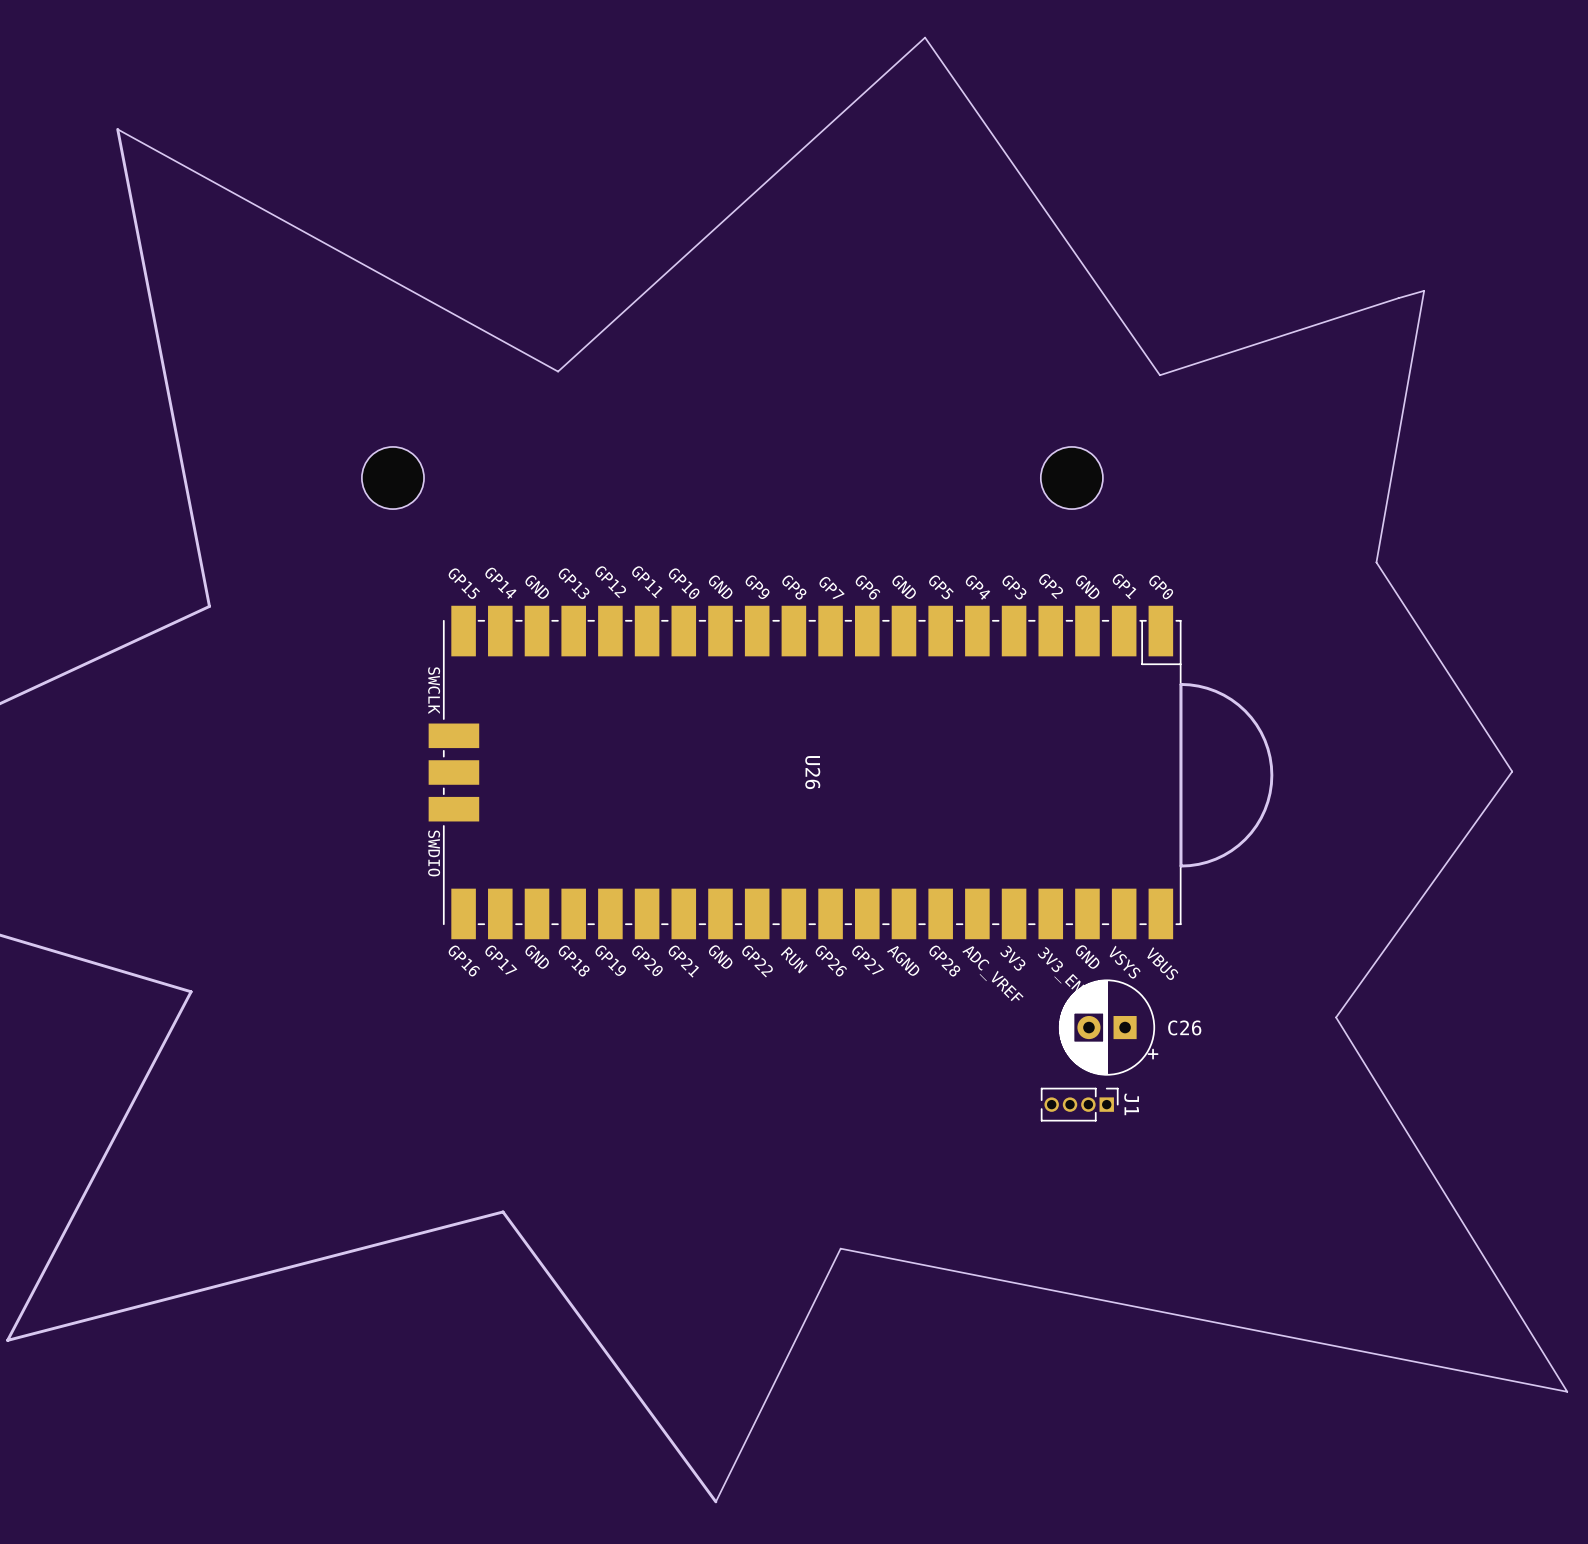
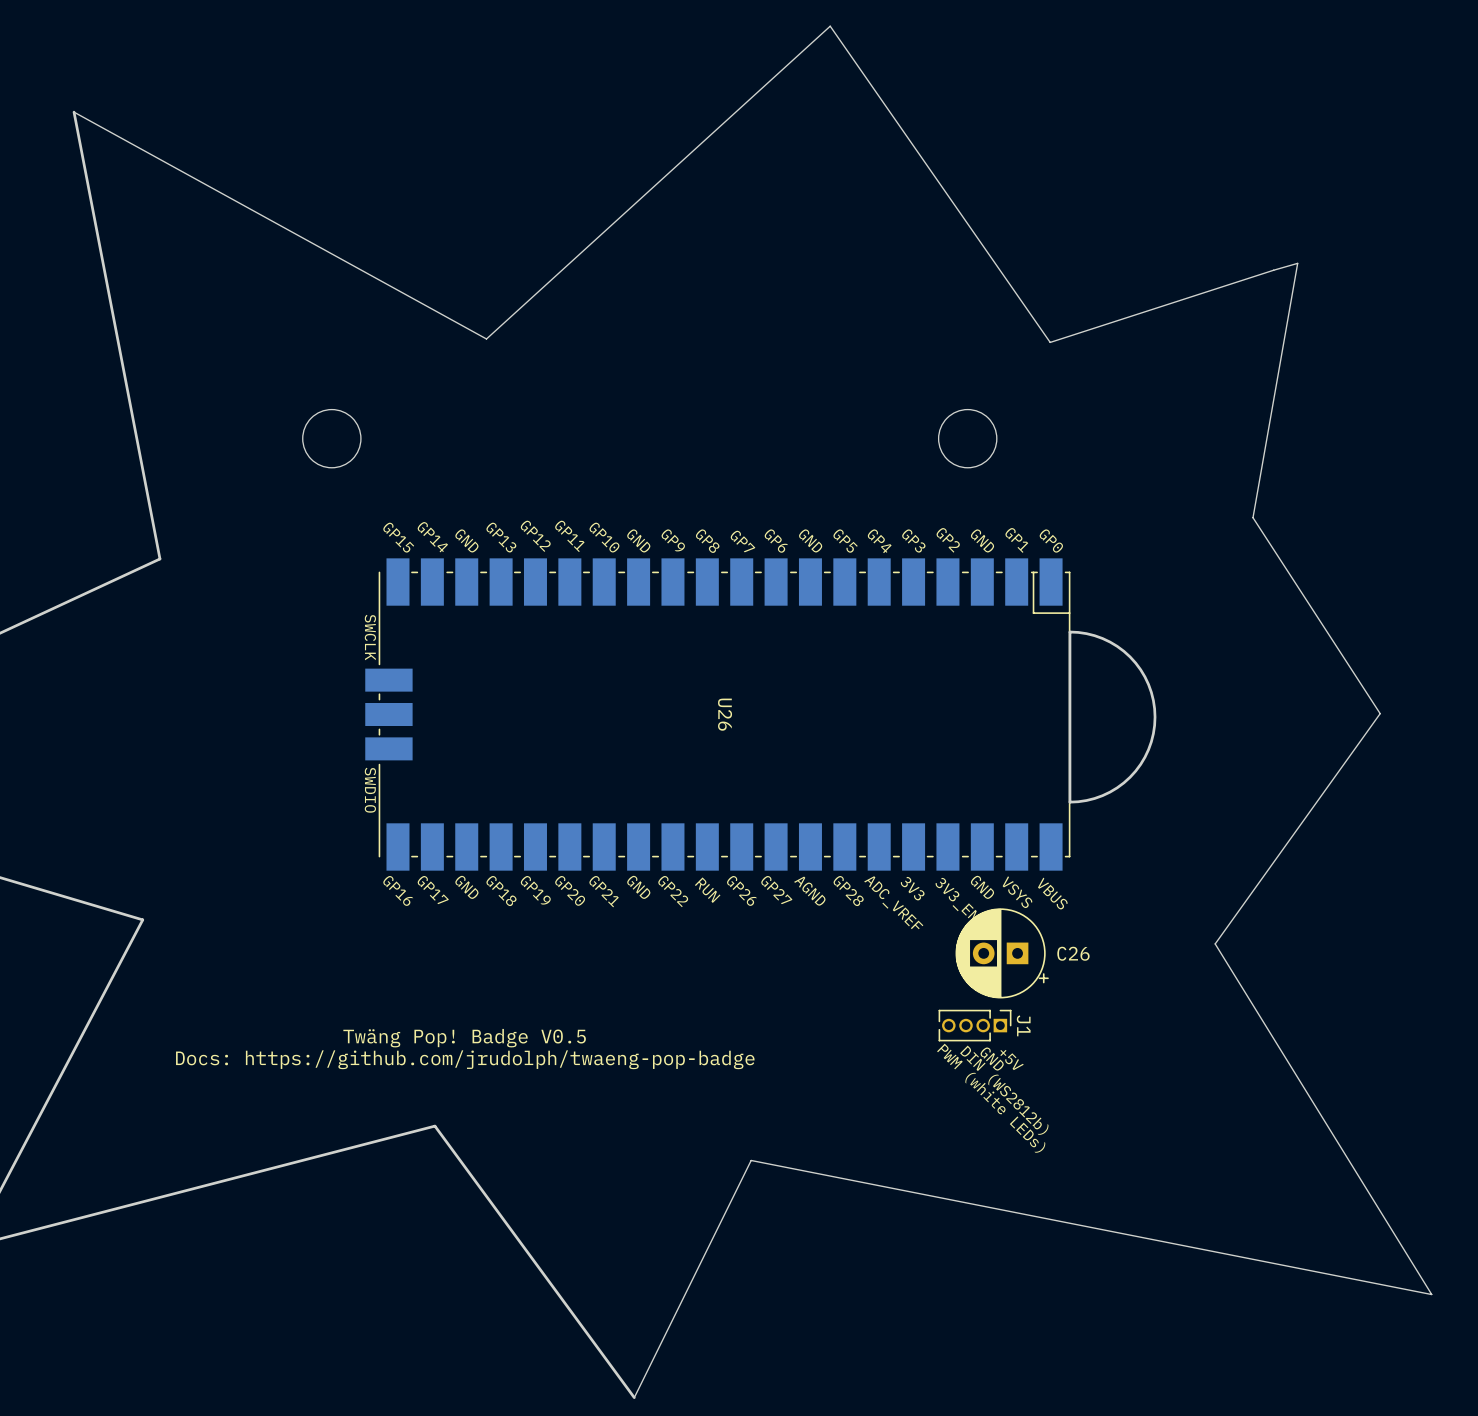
text: none -> Twäng Pop! Badge V0.5 (464, 1038)
text: none -> GND (992, 1059)
text: none -> Docs: https://github.com/jrudolph/twaeng-pop-badge (465, 1059)
text: none -> +5V (1012, 1060)
text: none -> DIN (WS2812b) (1004, 1090)
text: none -> PWM (white LEDs) (991, 1098)

